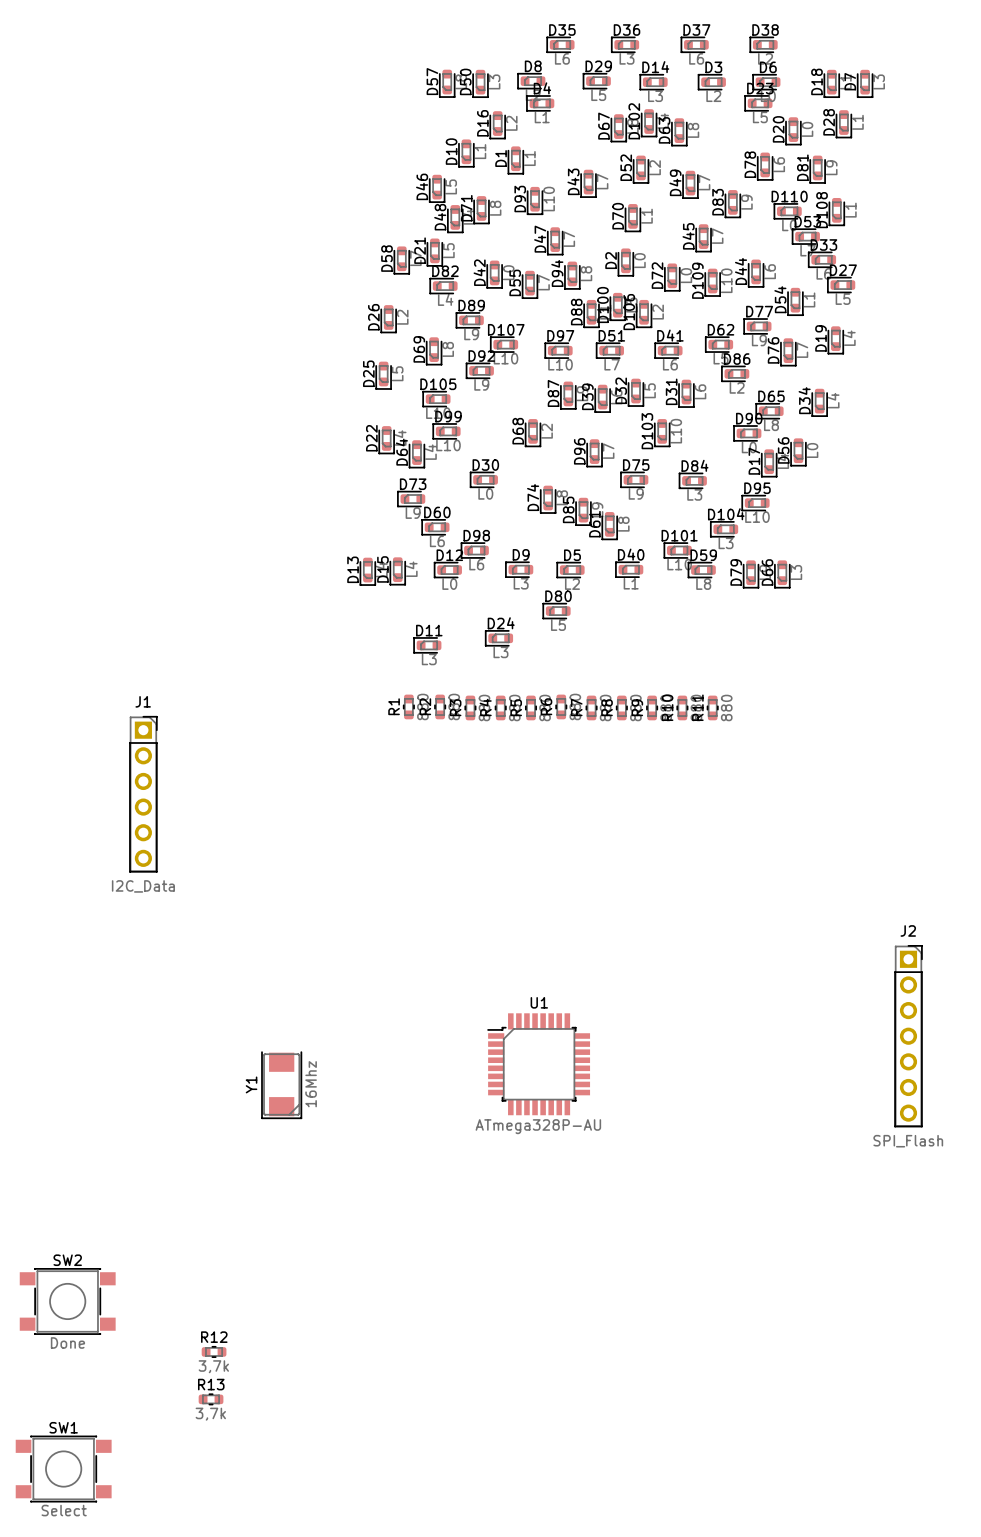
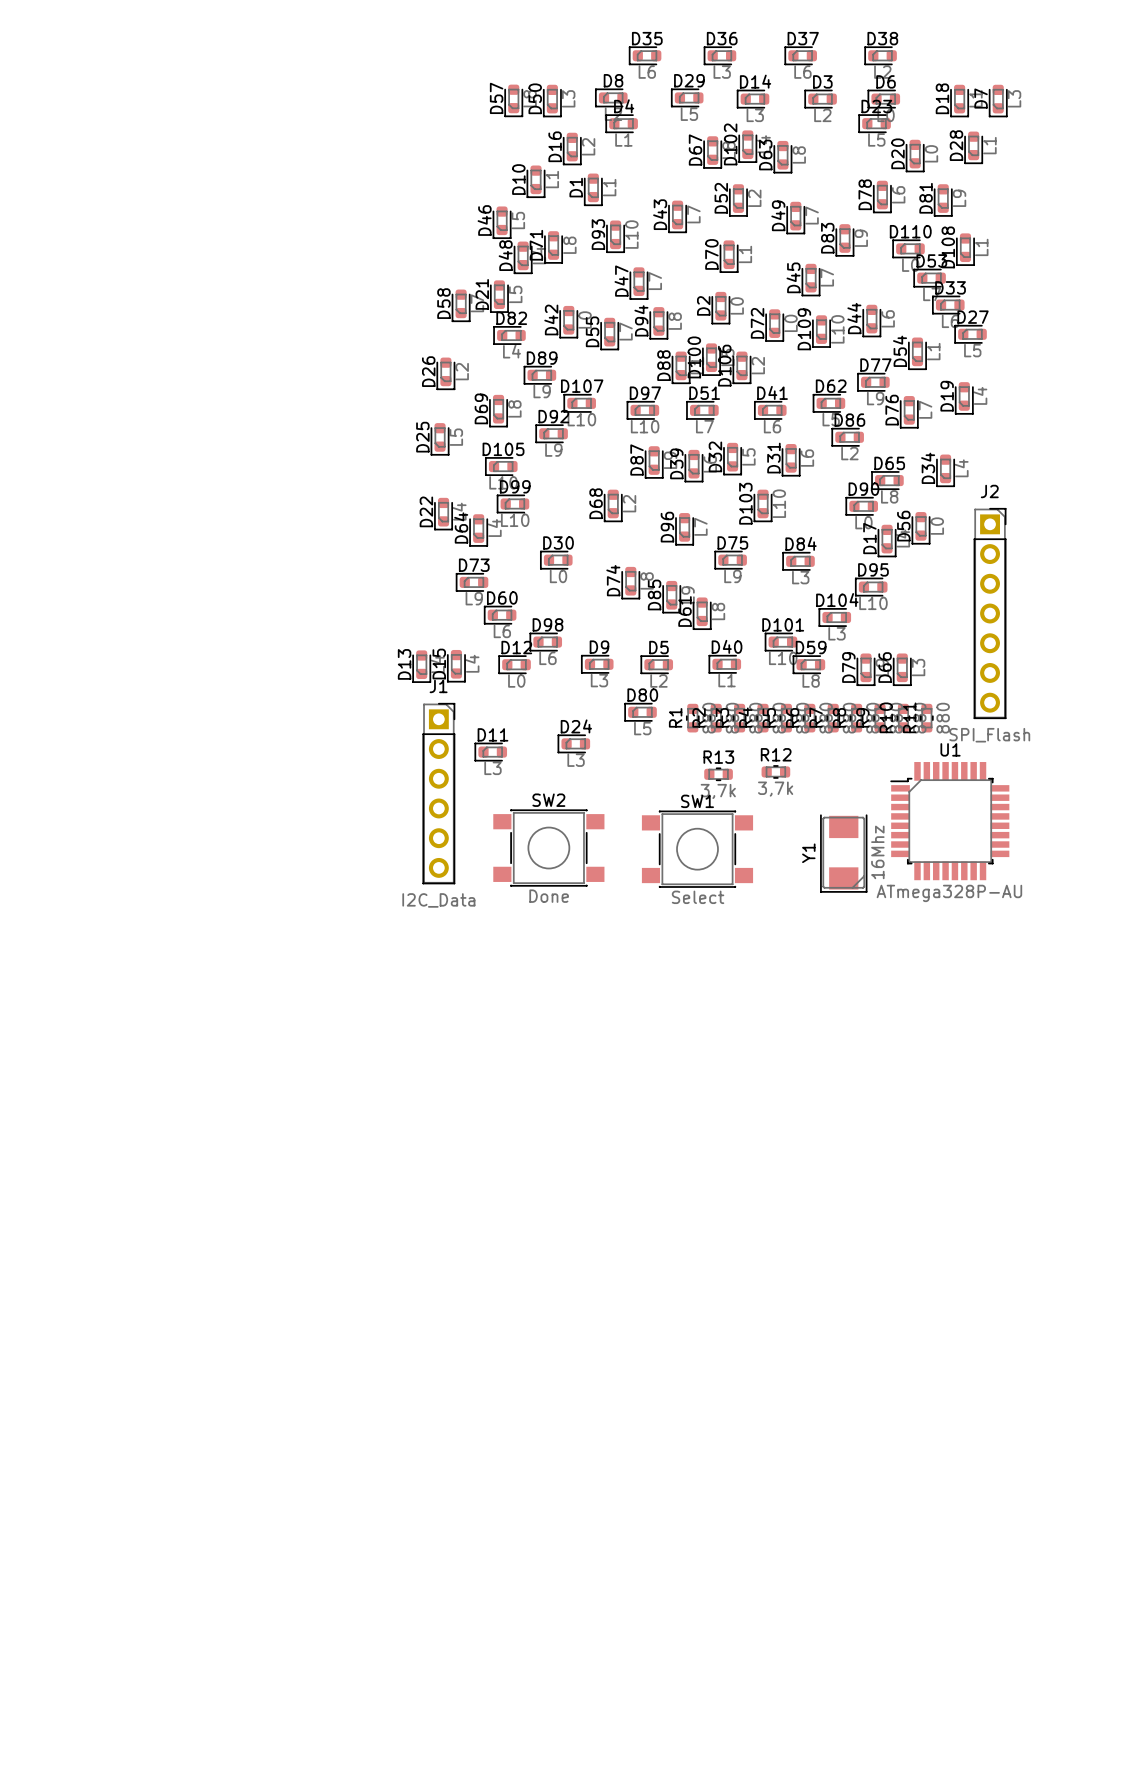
R1 position: (408, 706) -> (692, 718)
R2 position: (440, 706) -> (716, 718)
R6 position: (561, 706) -> (809, 718)
R3 position: (470, 707) -> (739, 718)
R4 position: (500, 707) -> (763, 718)
R5 position: (531, 707) -> (786, 718)
R7 position: (591, 707) -> (833, 718)
R8 position: (621, 707) -> (856, 718)
R9 position: (652, 707) -> (880, 718)
R10 position: (682, 707) -> (903, 718)
R11 position: (712, 707) -> (926, 718)
J1 position: (143, 794) -> (438, 793)
J2 position: (908, 1036) -> (990, 613)
U1 position: (538, 1064) -> (949, 821)
Y1 position: (281, 1085) -> (843, 853)
SW2 position: (67, 1301) -> (548, 848)
R12 position: (214, 1351) -> (775, 771)
R13 position: (211, 1399) -> (718, 774)
SW1 position: (63, 1469) -> (697, 849)

